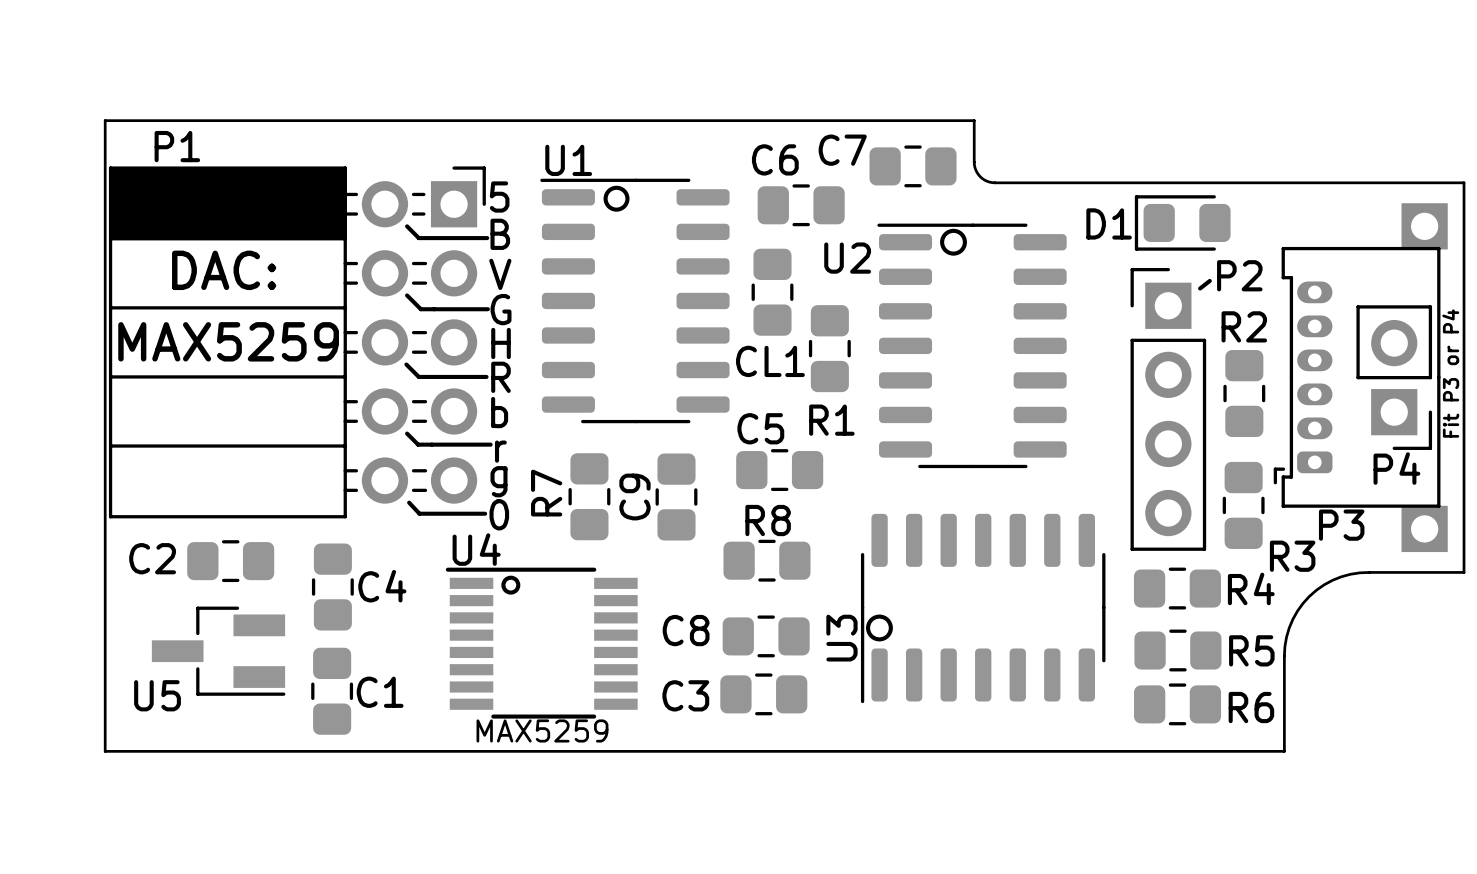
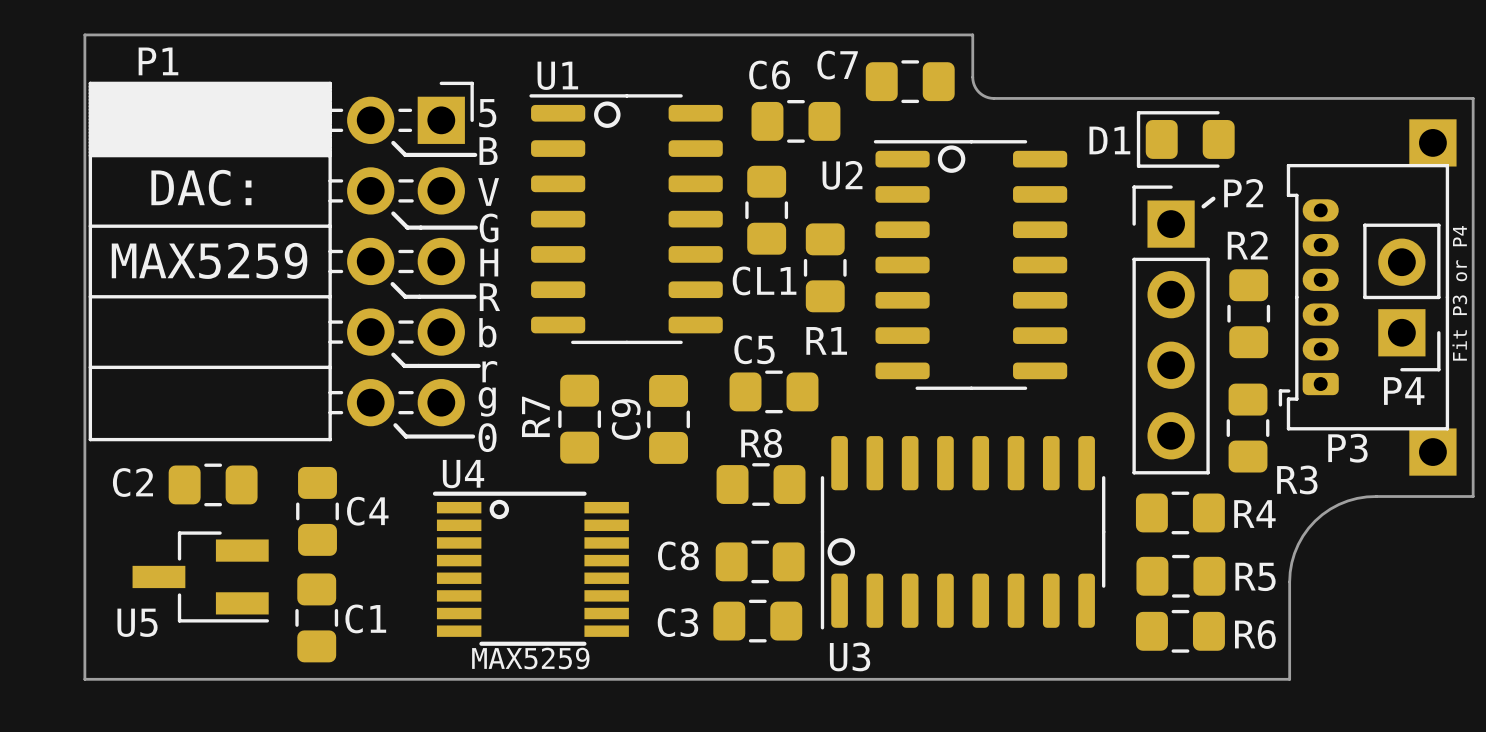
U3 footprint: [860, 513, 1106, 704] -> [820, 436, 1106, 630]
drawing position: (879, 627) -> (841, 551)
U3 name position: U3 (841, 638) -> U3 (850, 656)

